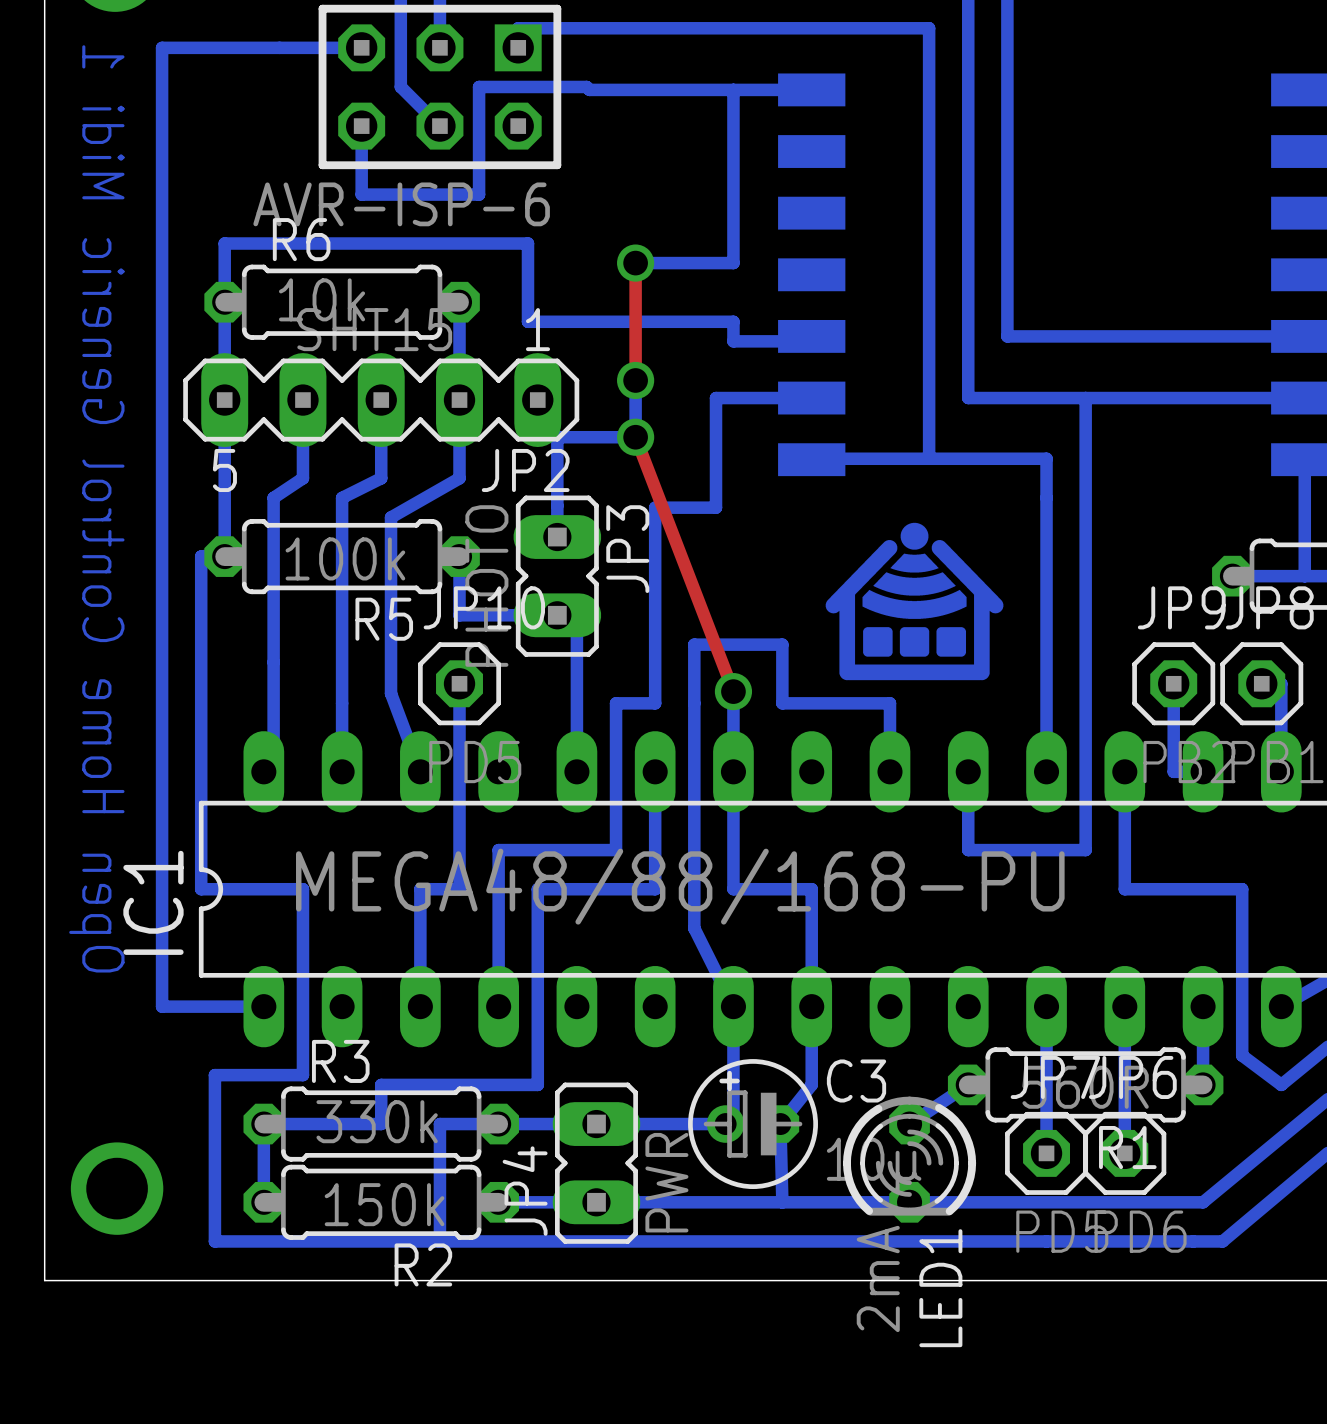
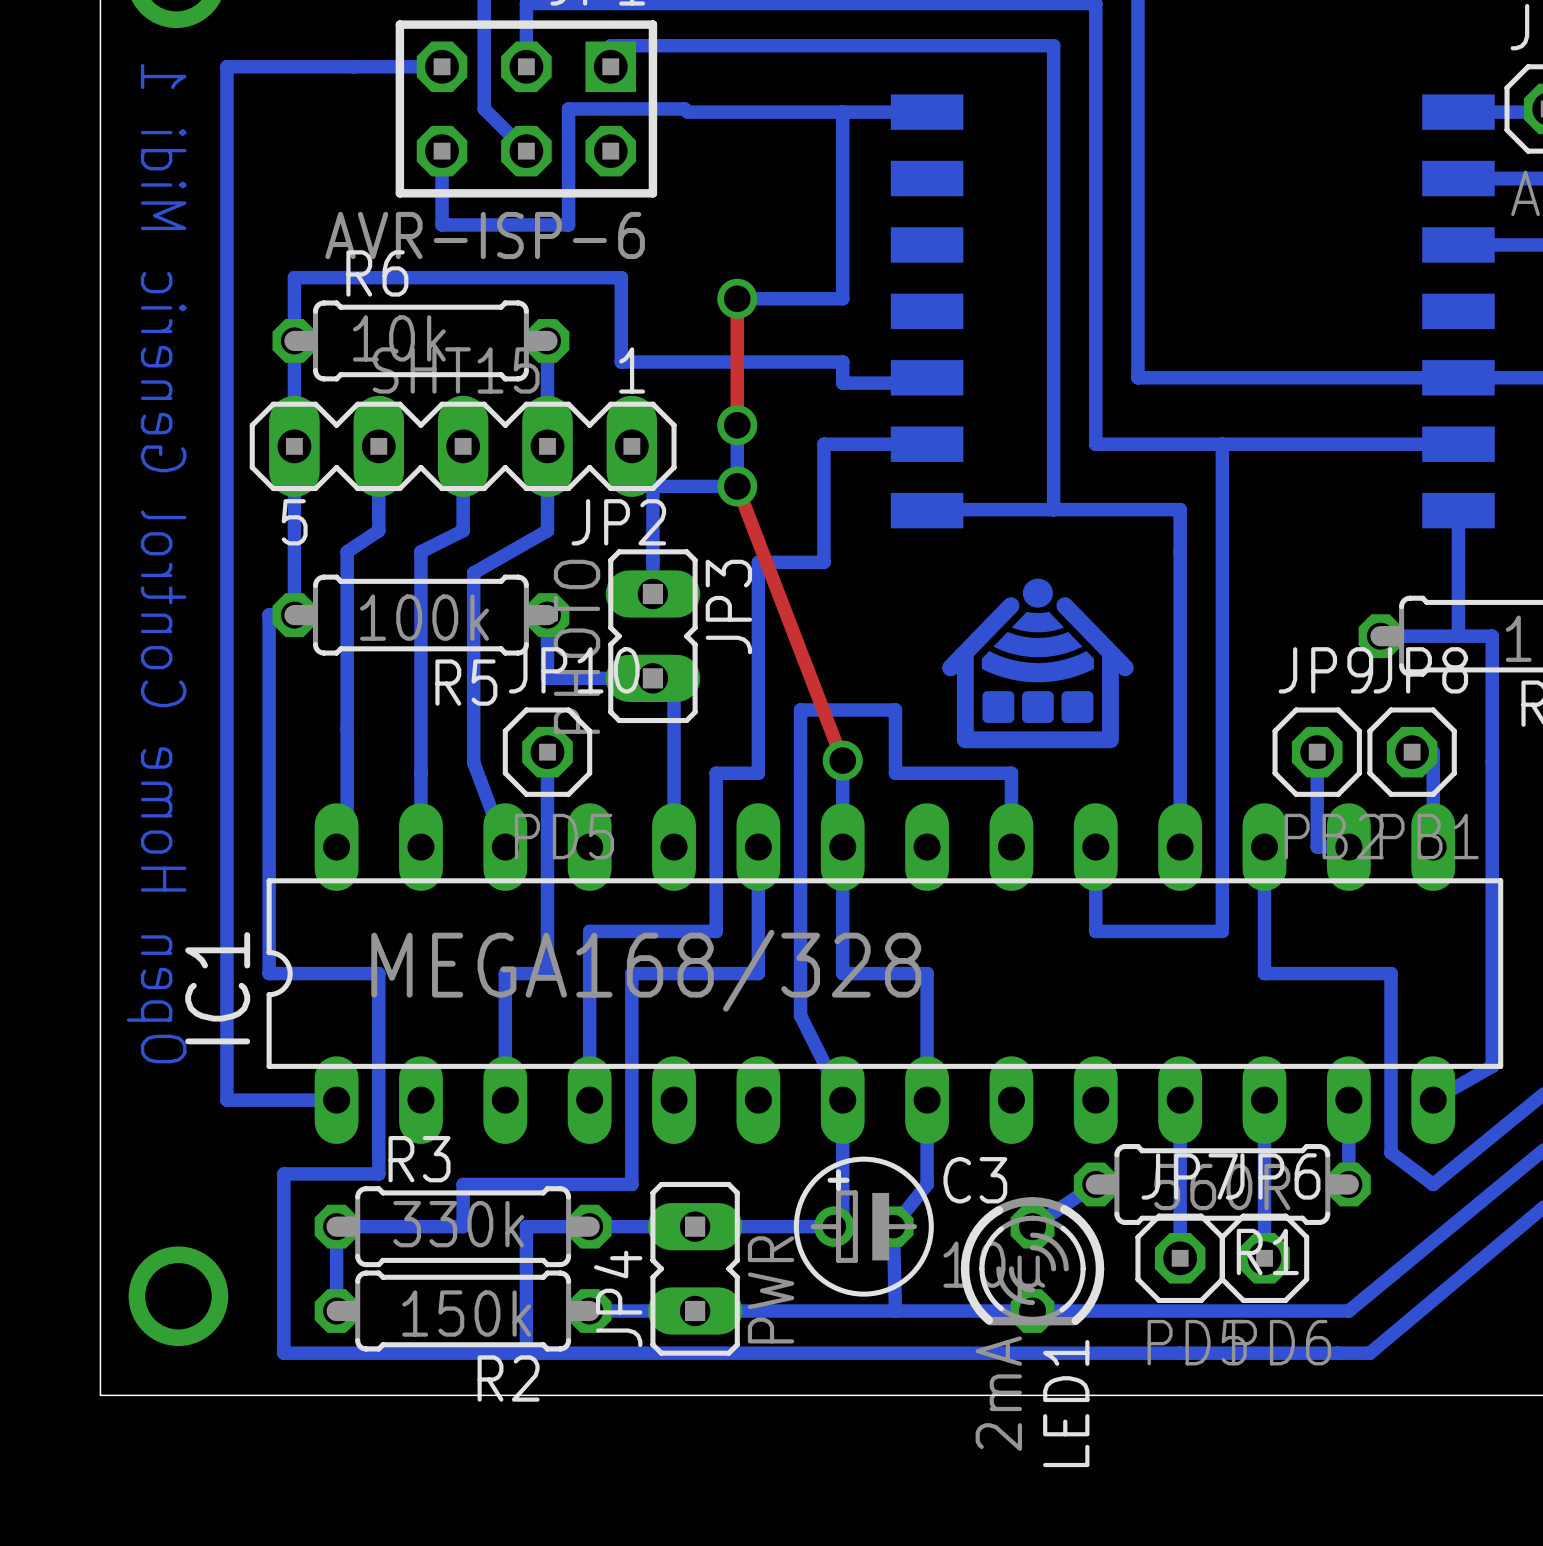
IC1 value: MEGA48/88/168-PU (680, 886) -> MEGA168/328 (646, 970)

